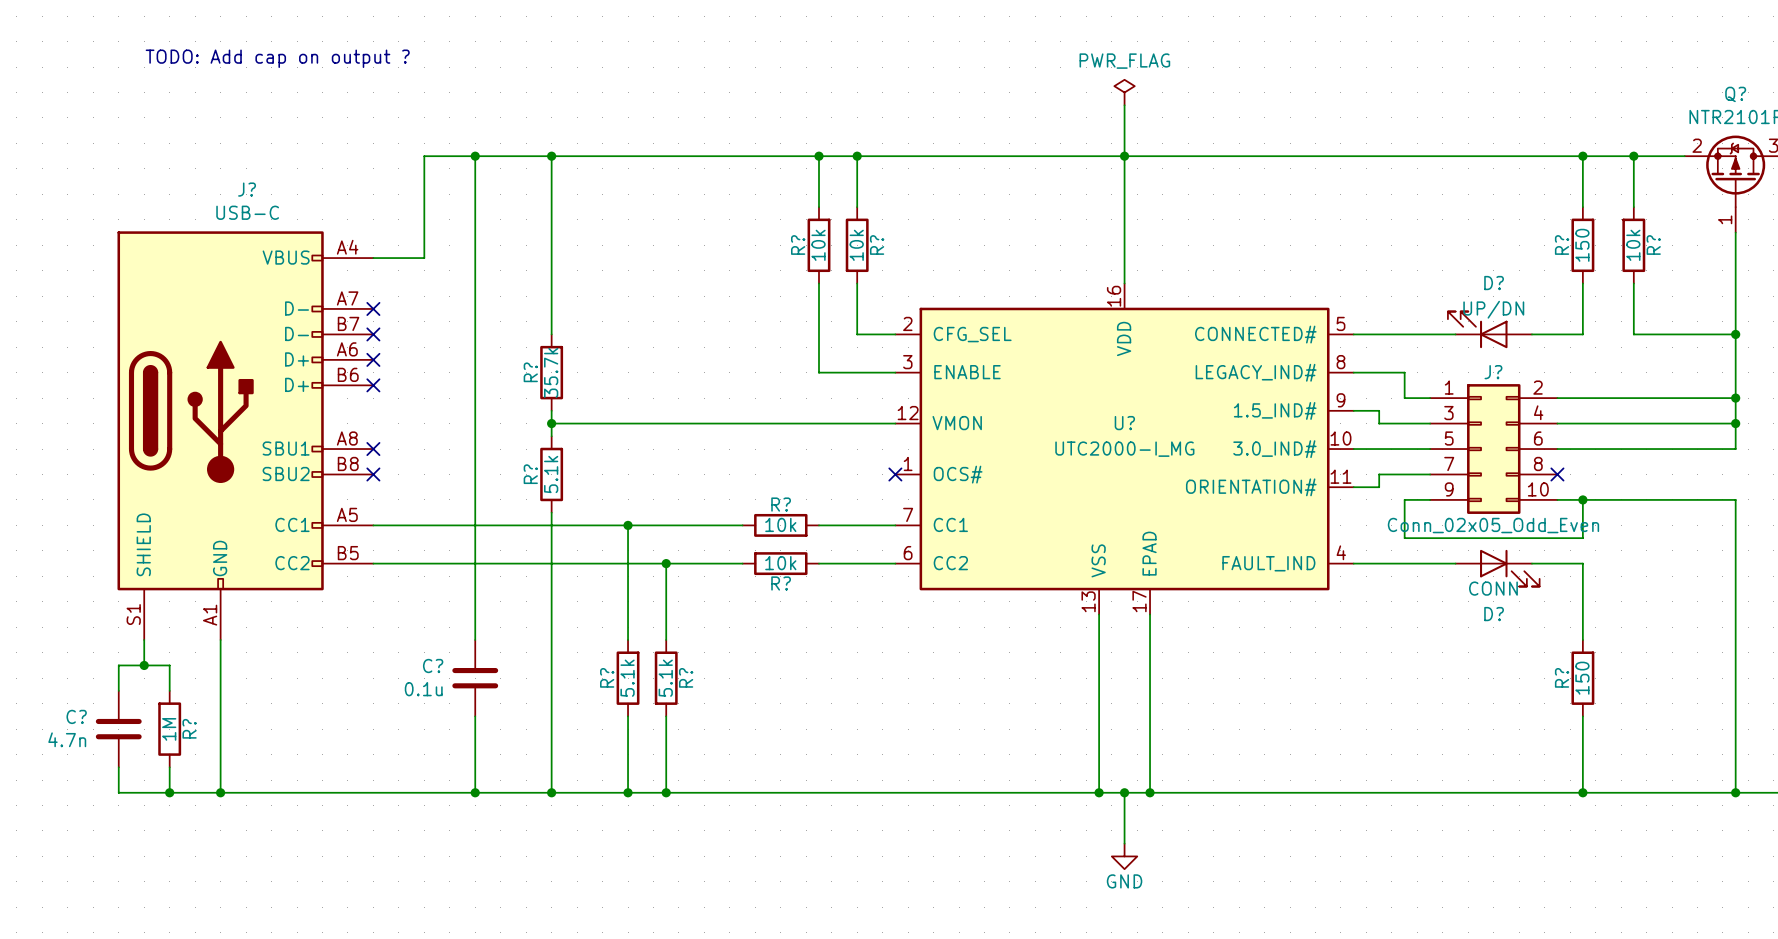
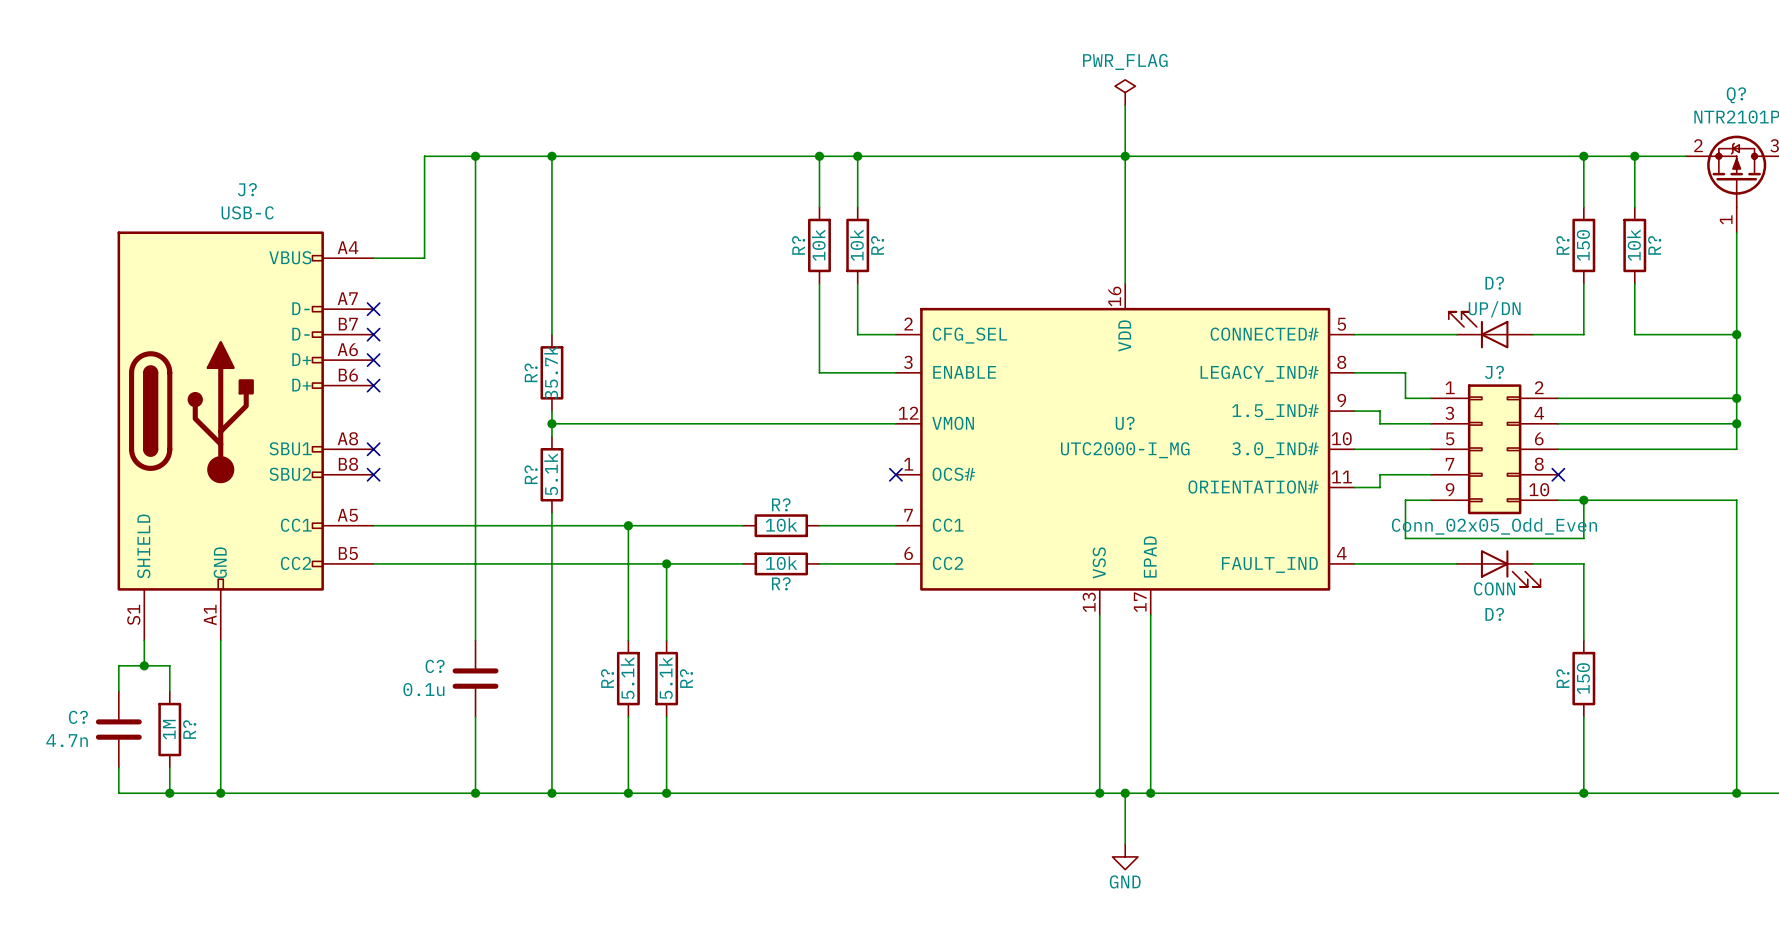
text: TODO: Add cap on output ? (277, 58) -> none

